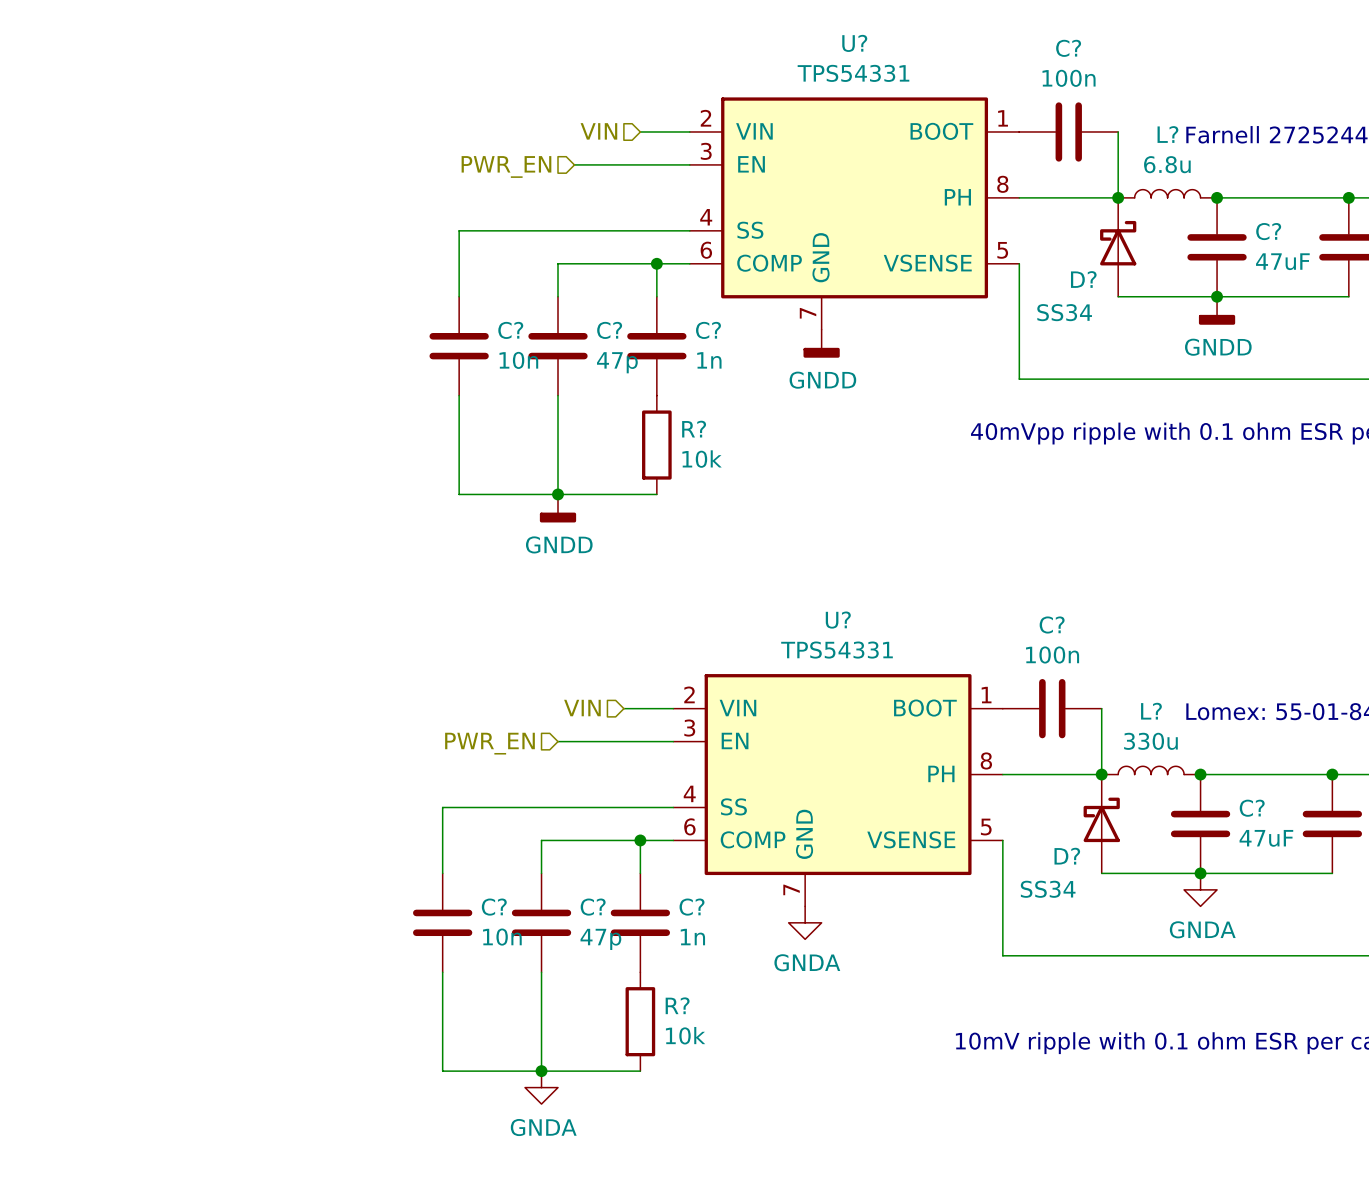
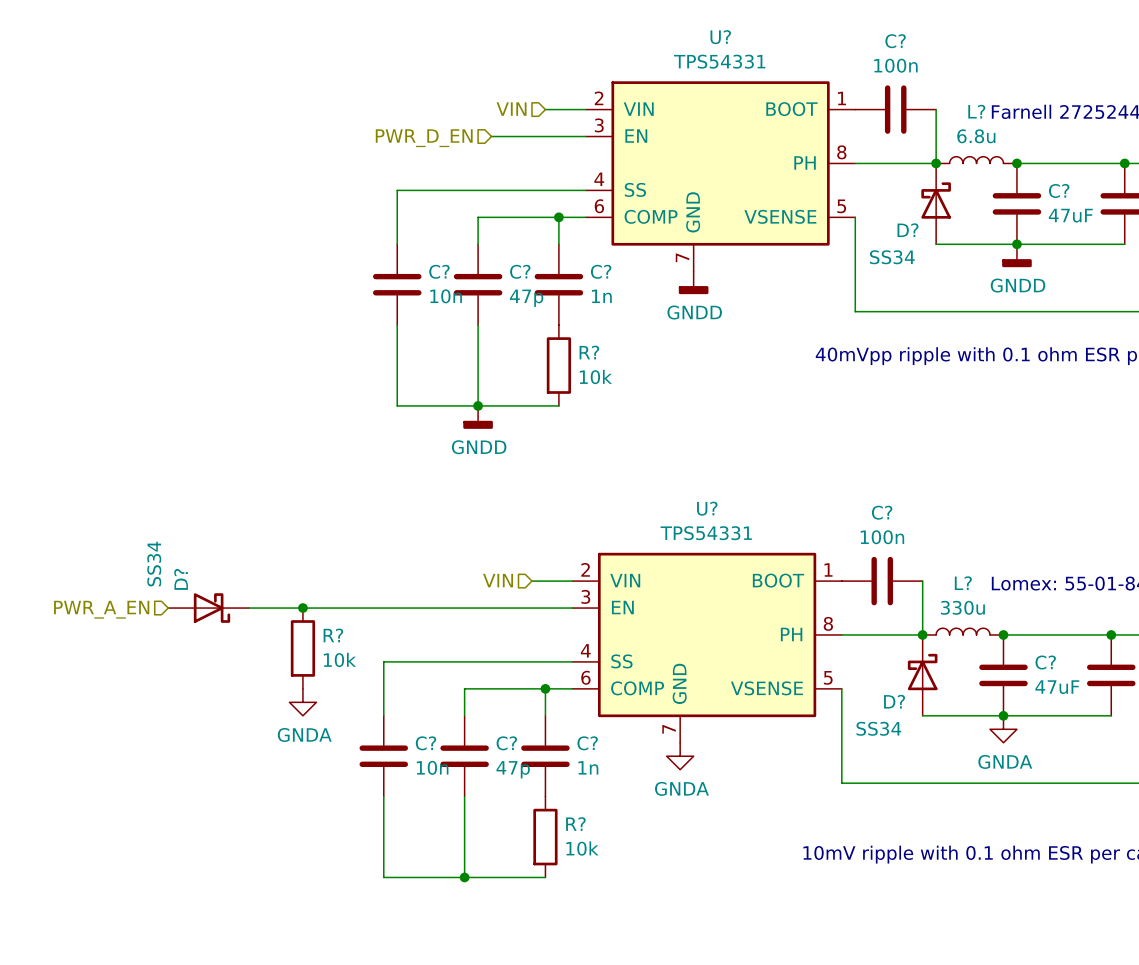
hierarchical label: PWR_EN (506, 166) -> PWR_D_EN (424, 138)
D?: none -> SS34 (208, 608)
wire: none -> (249, 608) (478, 608)
junction: none -> (302, 608)
hierarchical label: none -> PWR_A_EN (101, 609)
hierarchical label: PWR_EN (489, 743) -> none
R?: none -> 10k (302, 648)
power symbol position: GNDA (541, 1087) -> GNDA (302, 702)

